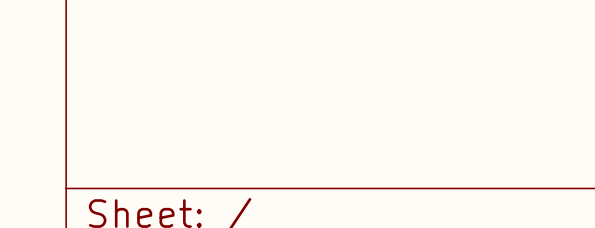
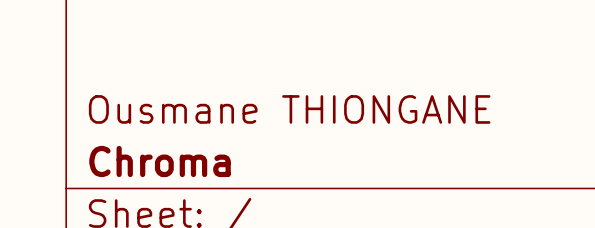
title block: none -> Ousmane THIONGANE (289, 109)
title block: none -> Chroma (160, 161)

